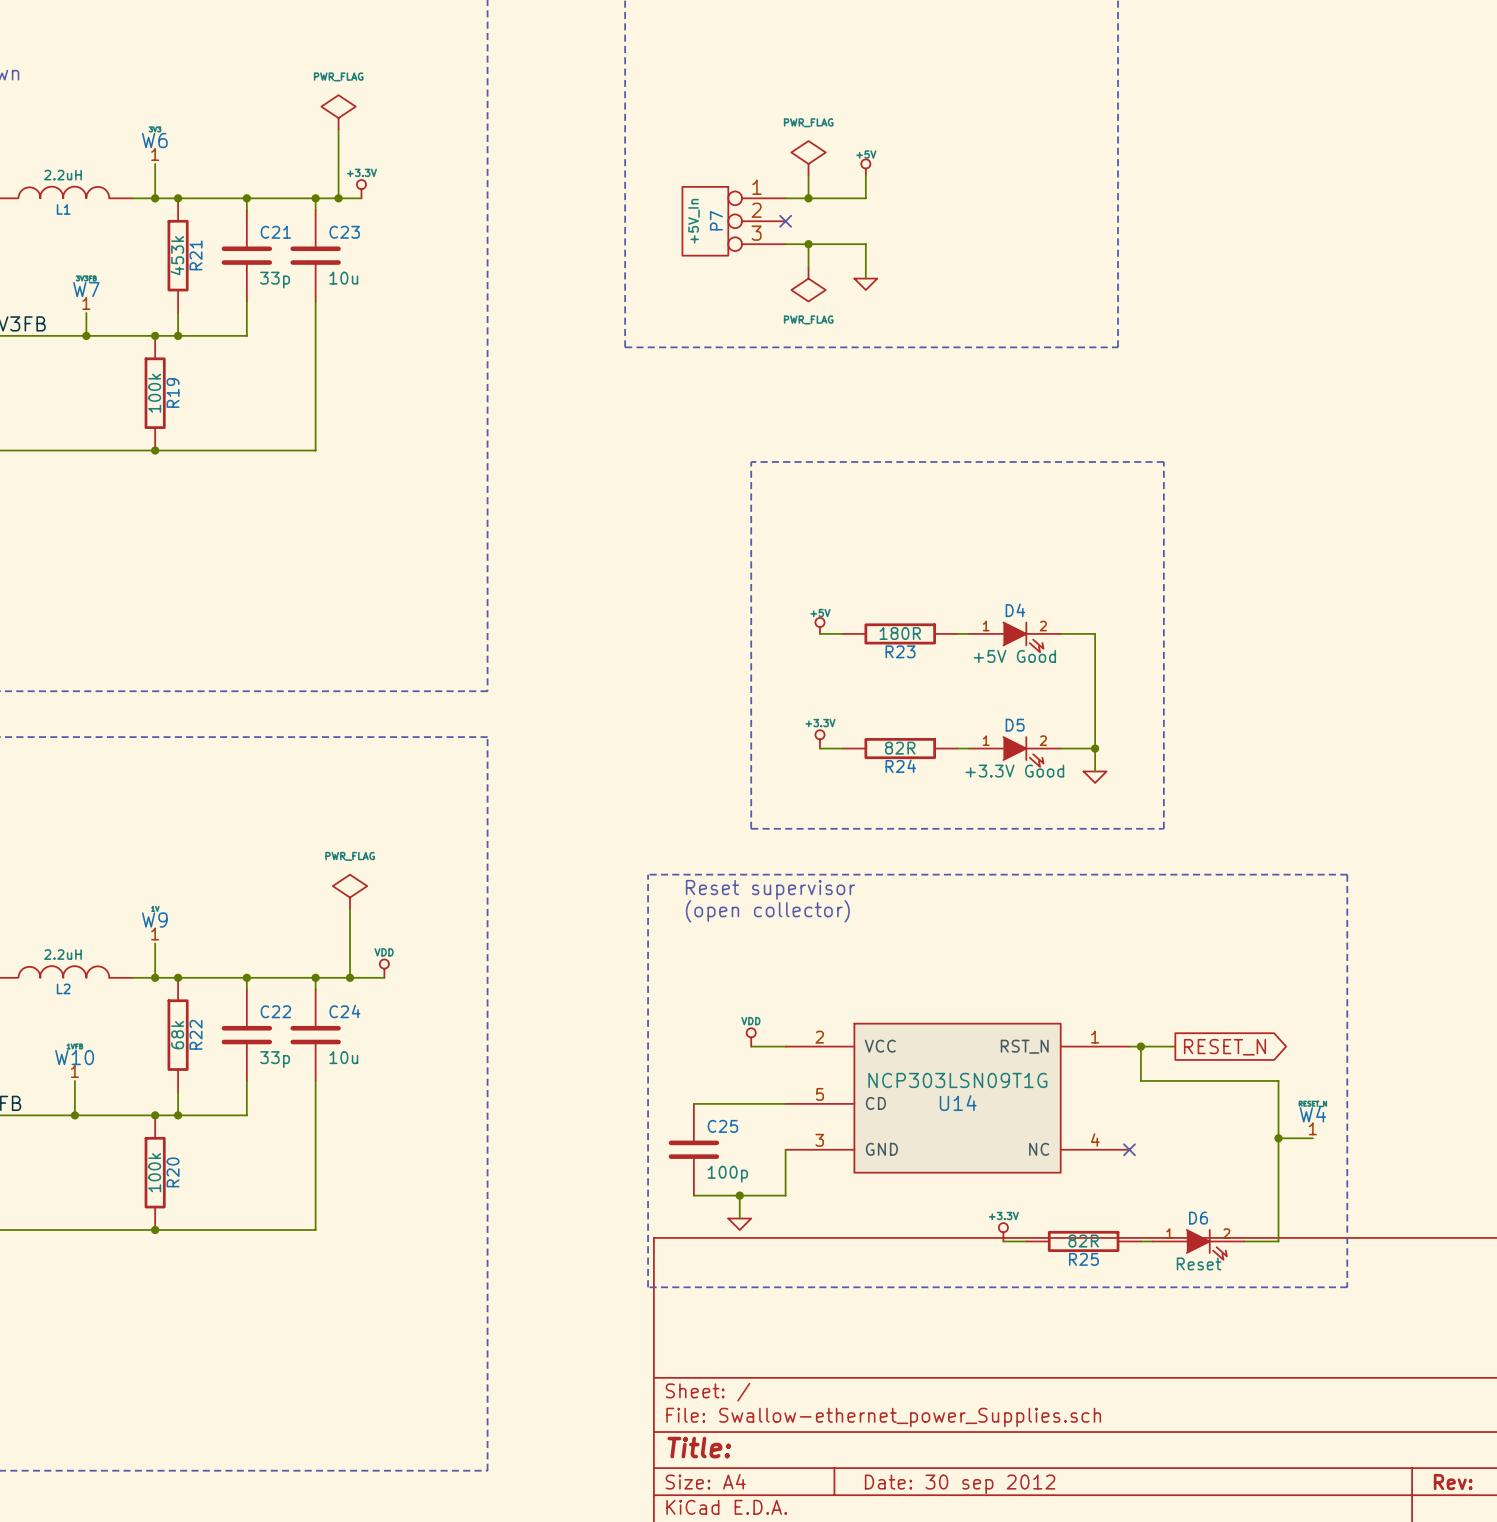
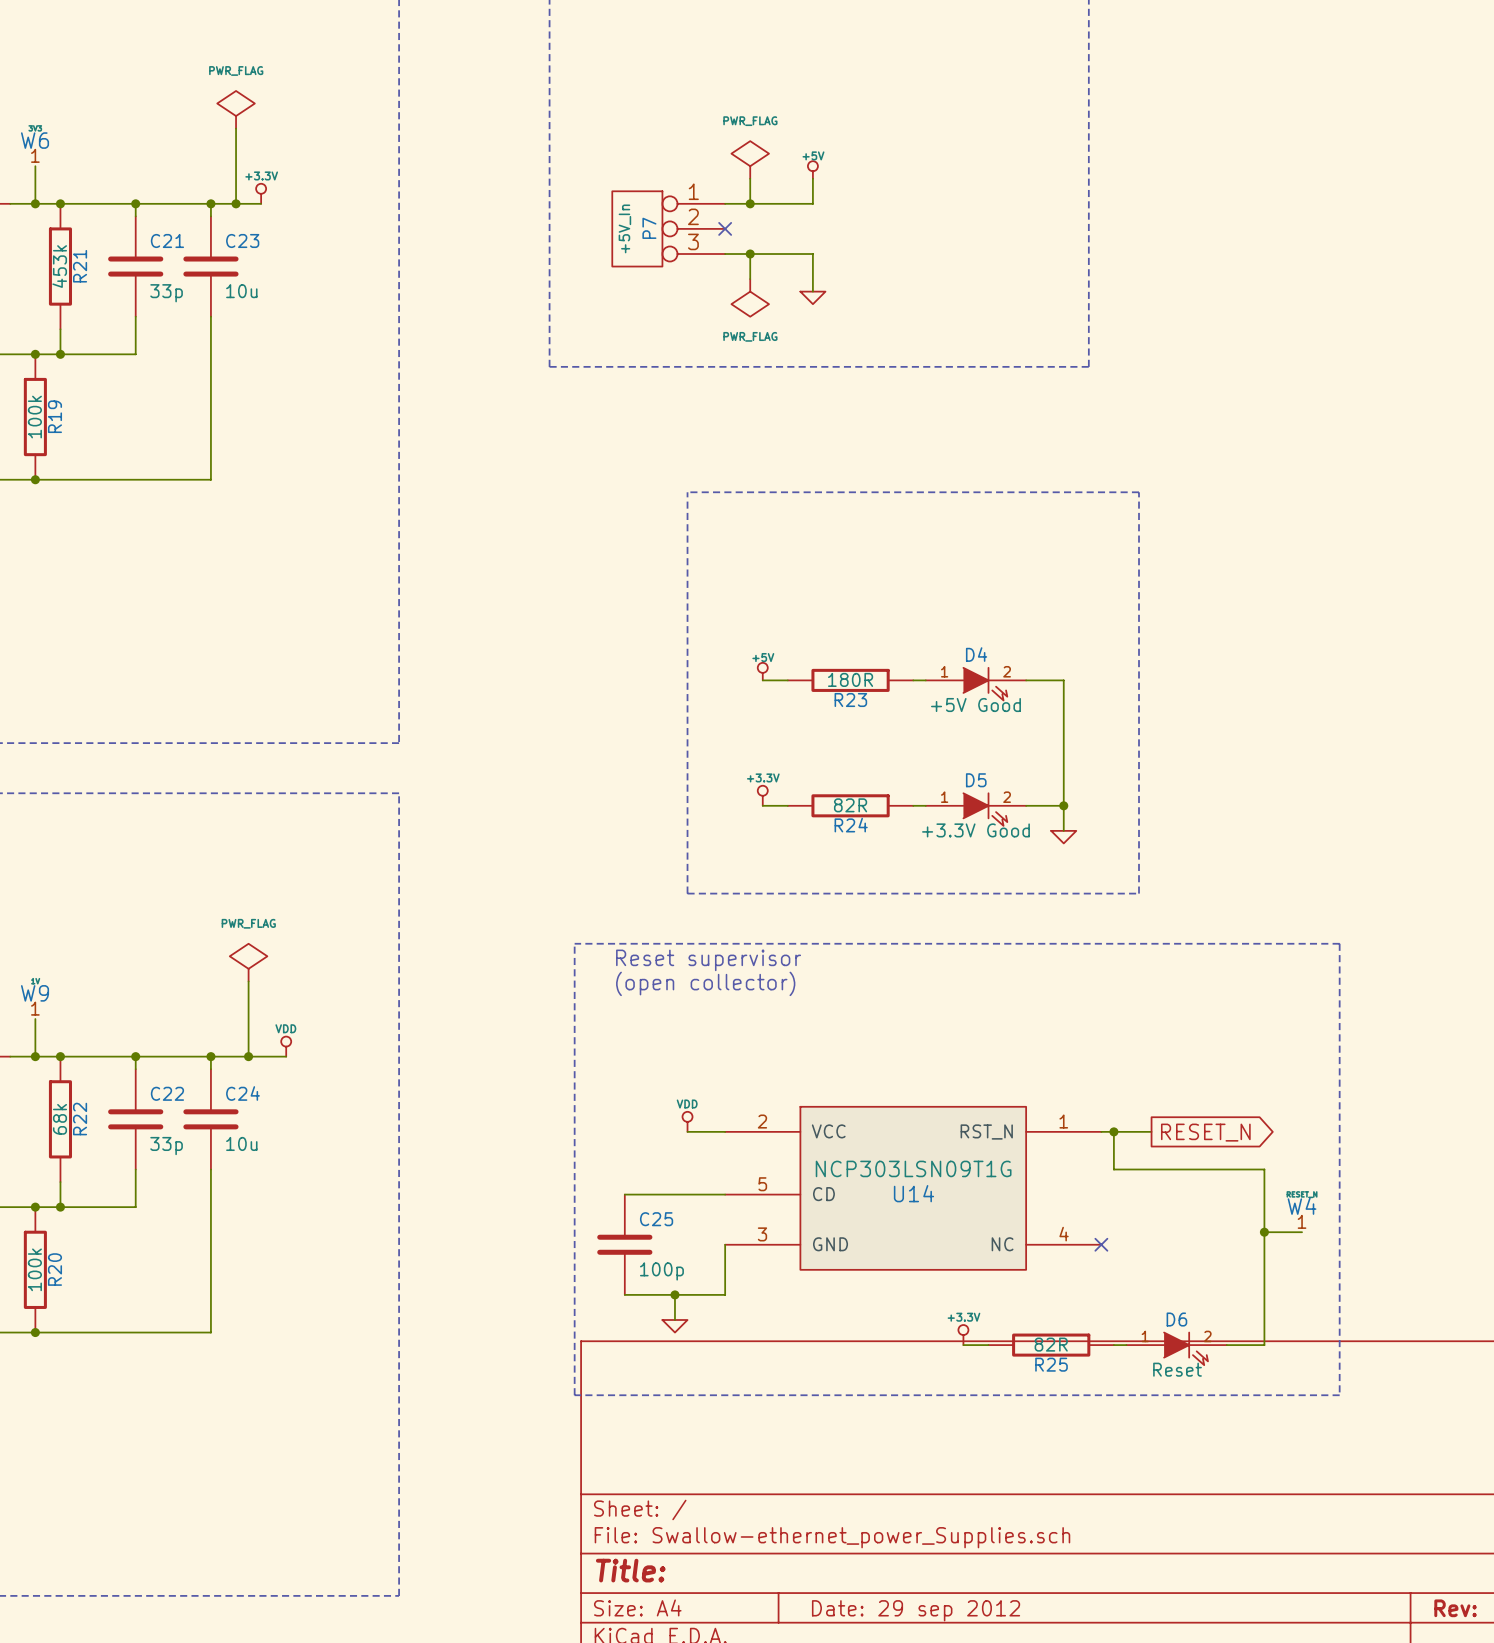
title block: Date: 30 sep 2012 (960, 1484) -> Date: 29 sep 2012 (916, 1610)

